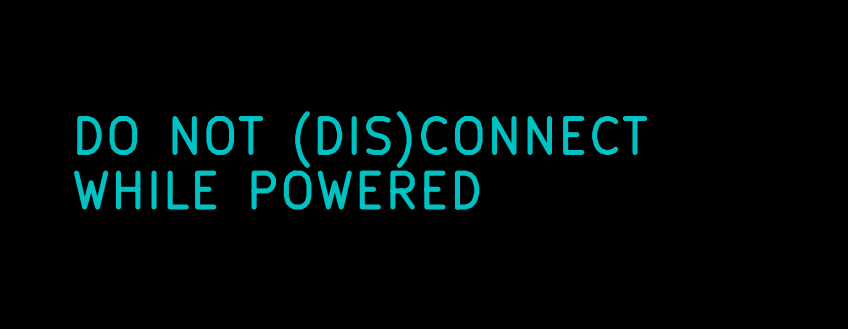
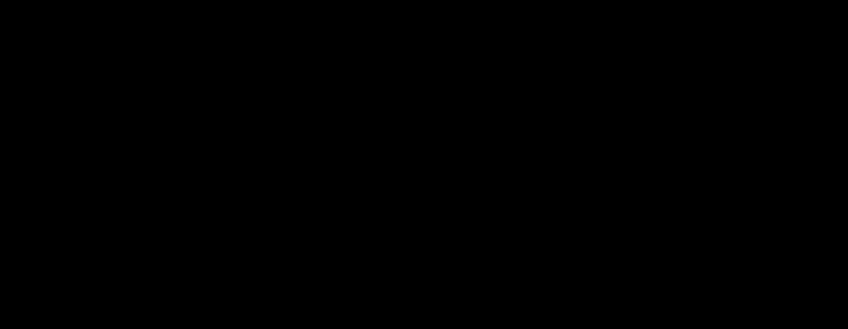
text: DO NOT (DIS)CONNECT (362, 139) -> none
text: WHILE POWERED (276, 190) -> none

